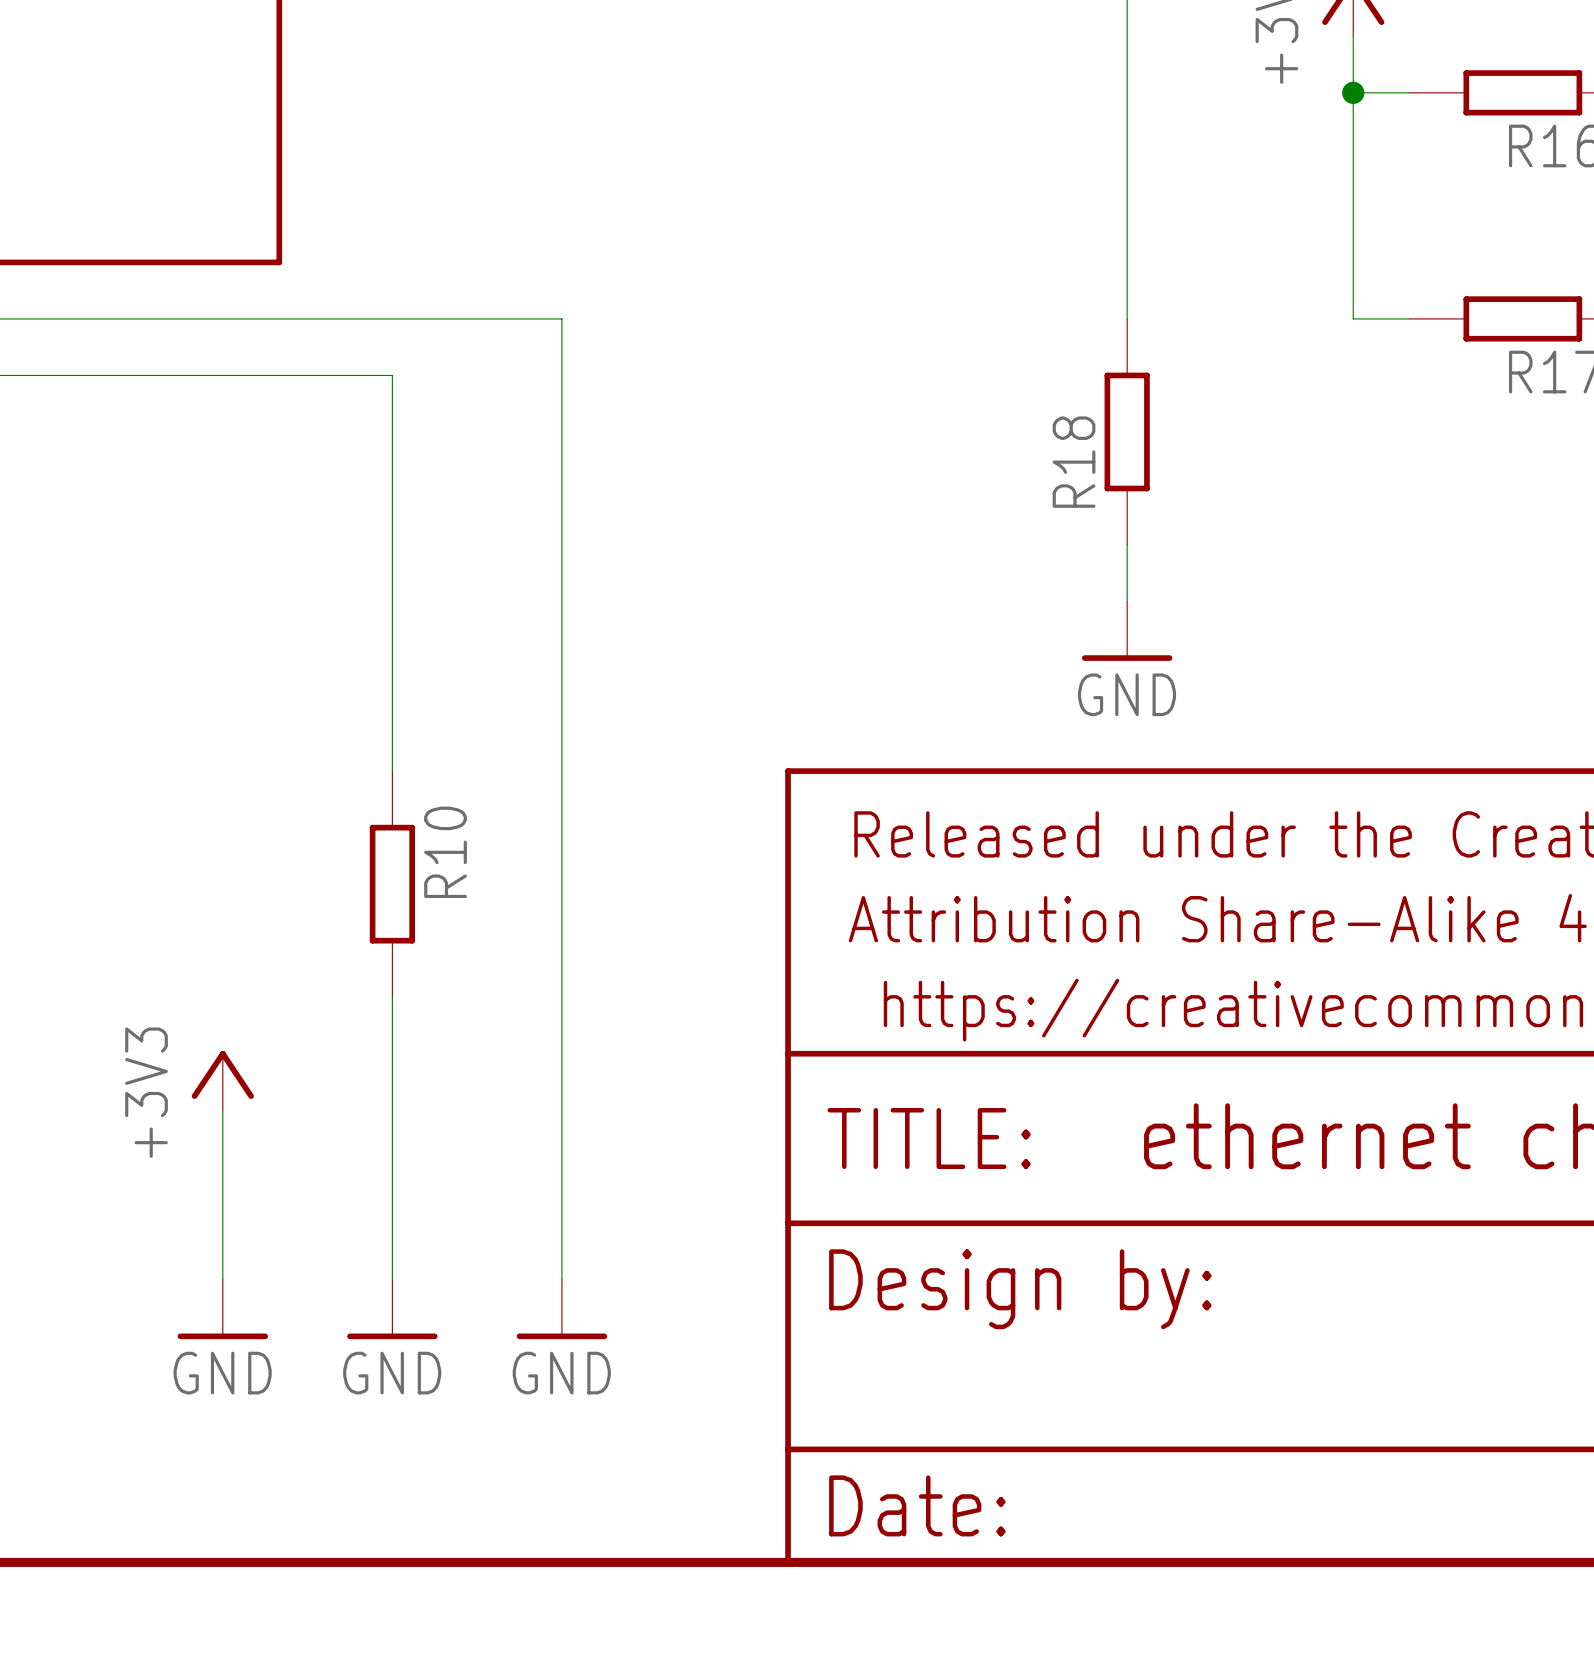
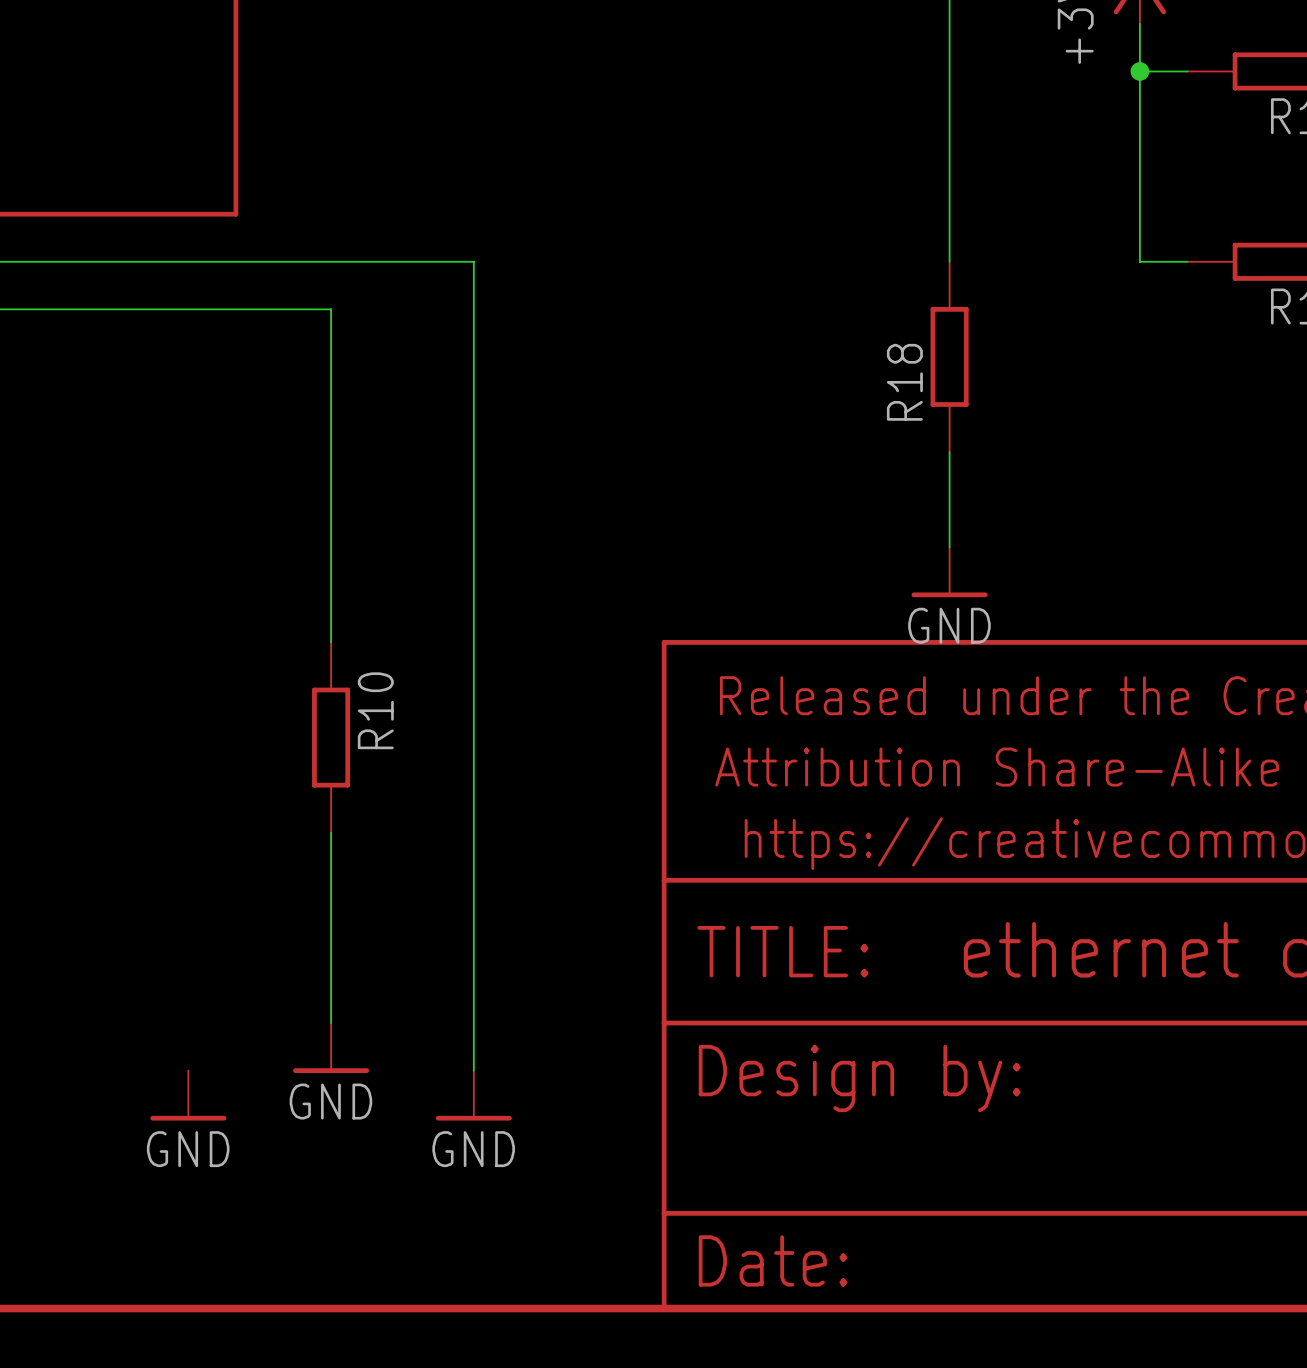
power symbol position: GND (1127, 631) -> GND (949, 572)
power symbol: +3V3 (222, 1080) -> none
wire: (222, 1110) (222, 1279) -> none
power symbol position: GND (392, 1309) -> GND (331, 1048)

